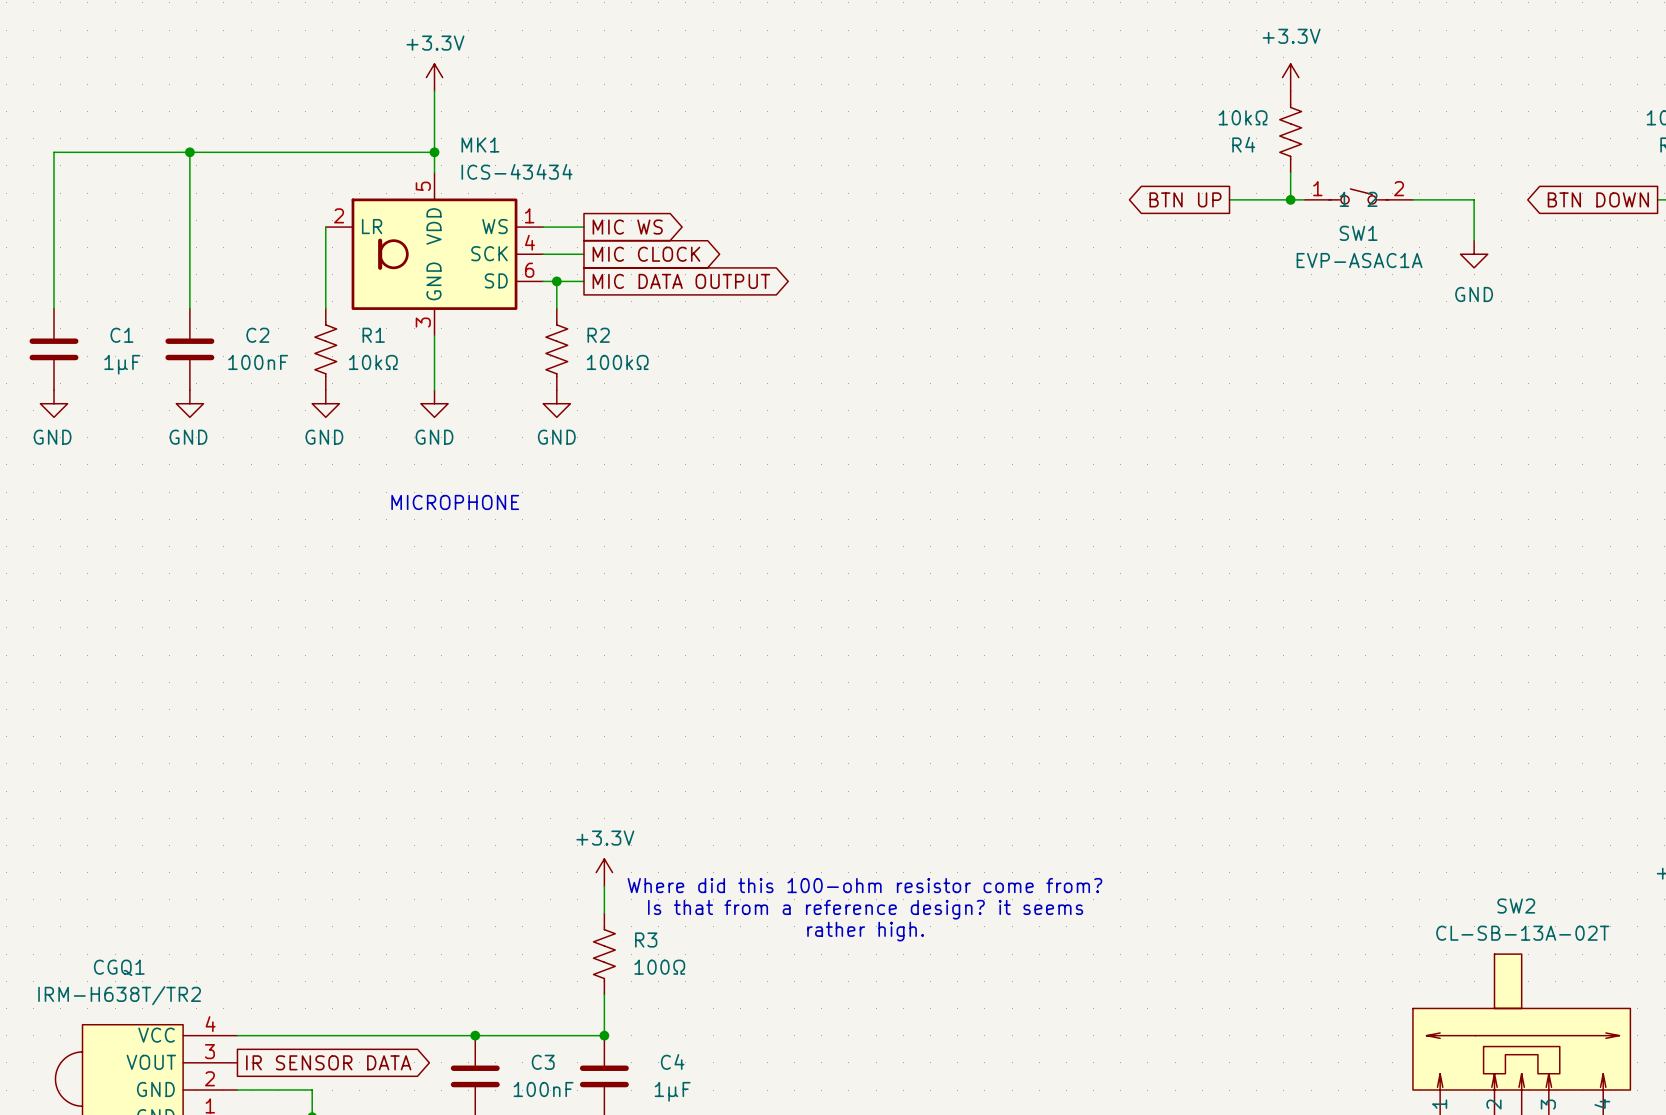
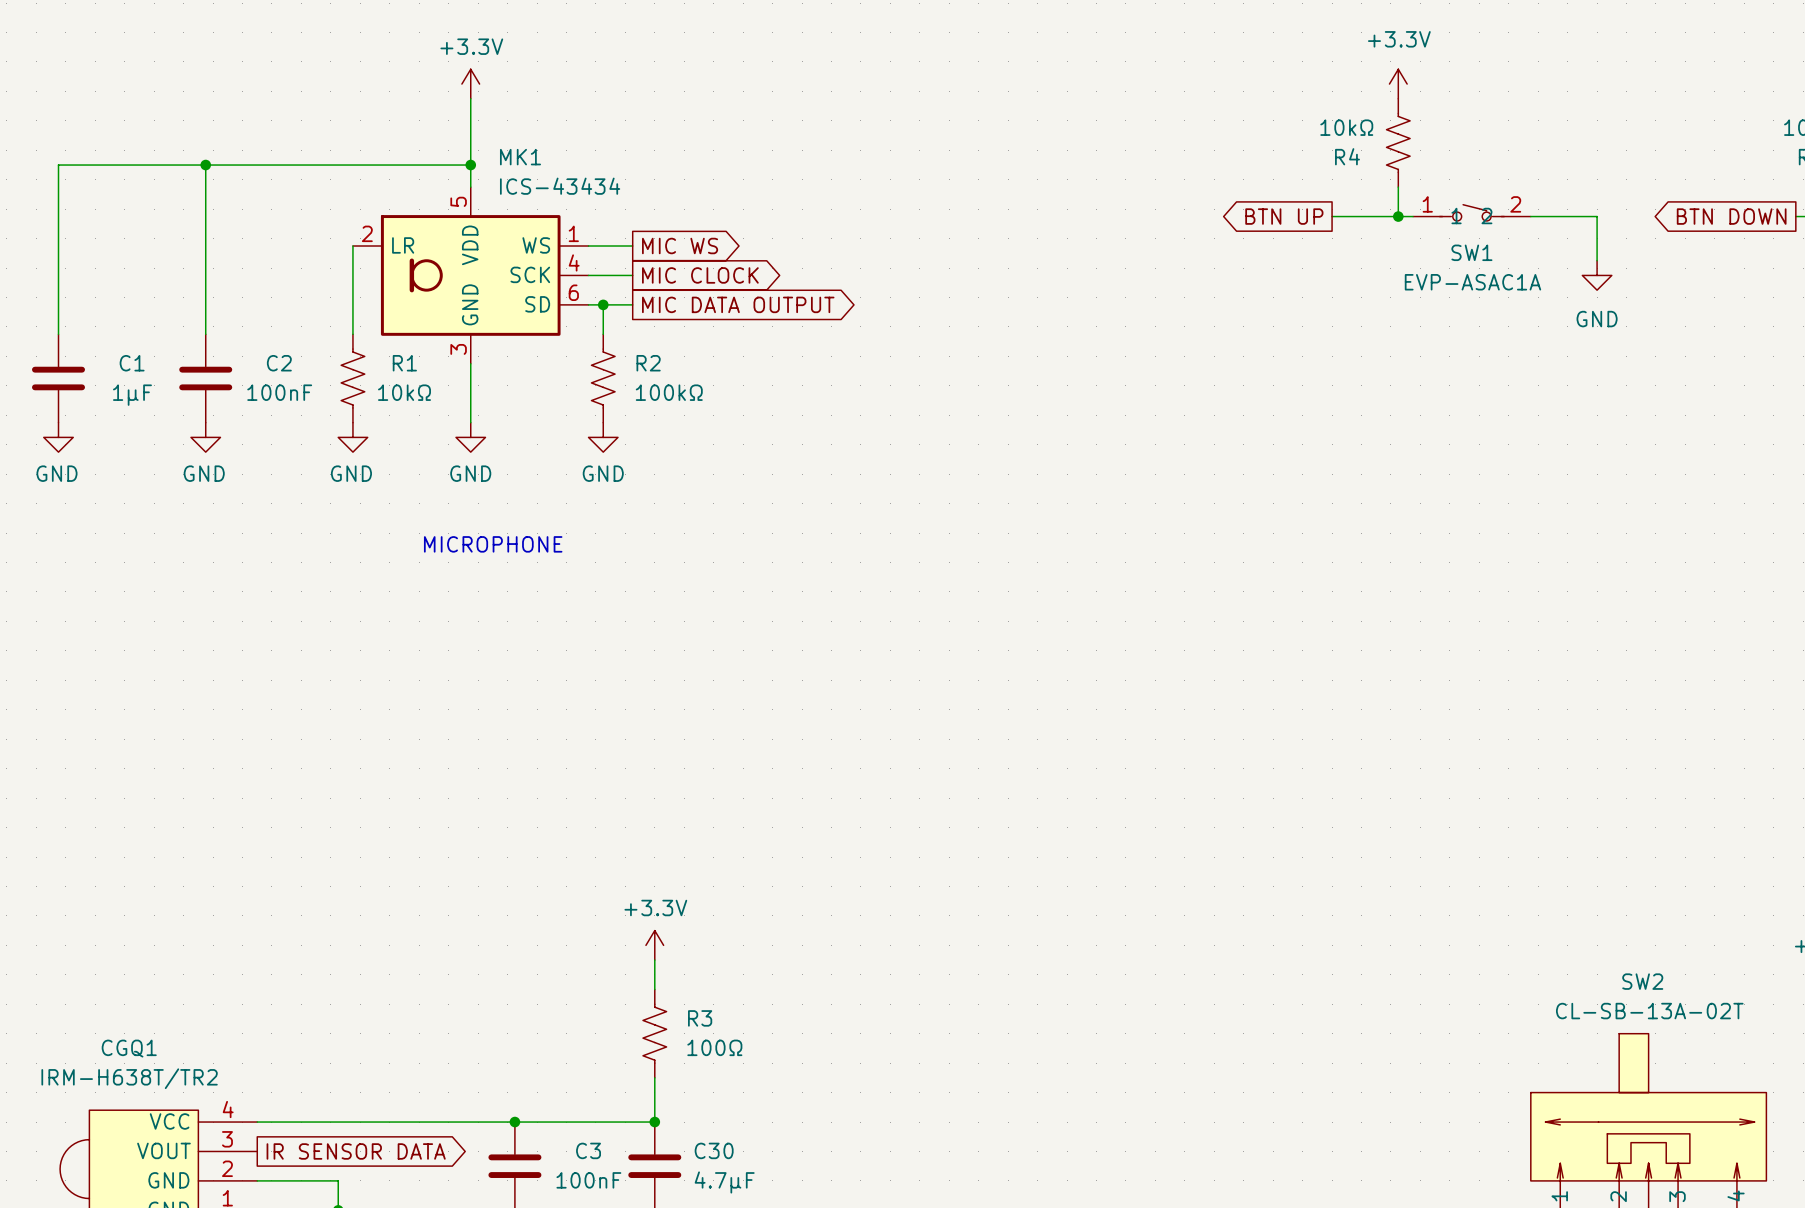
text: Where did this 100-ohm resistor come from? (864, 885) -> none
text: Is that from a reference design? it seems (865, 909) -> none
text: rather high. (865, 931) -> none
C4 name: C4 (672, 1061) -> C30 (714, 1150)
C4 value: 1µF (672, 1091) -> 4.7µF (724, 1182)

